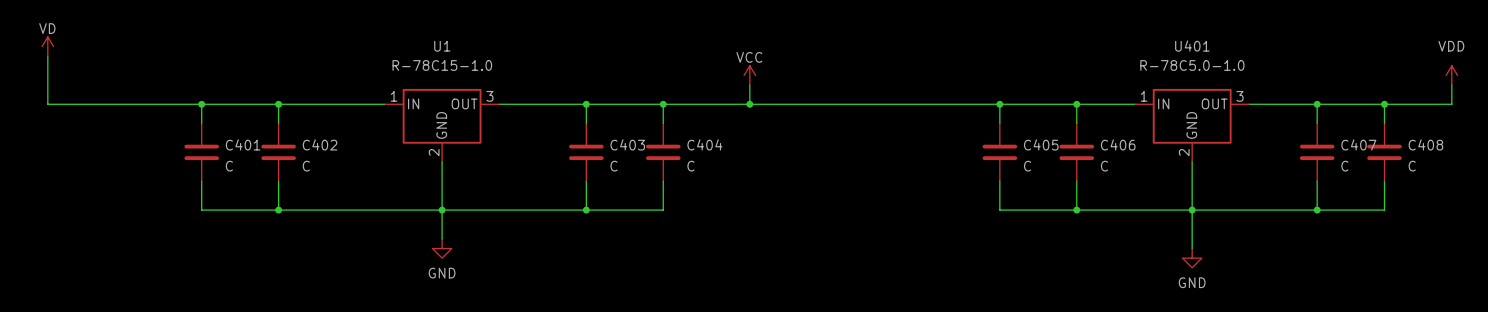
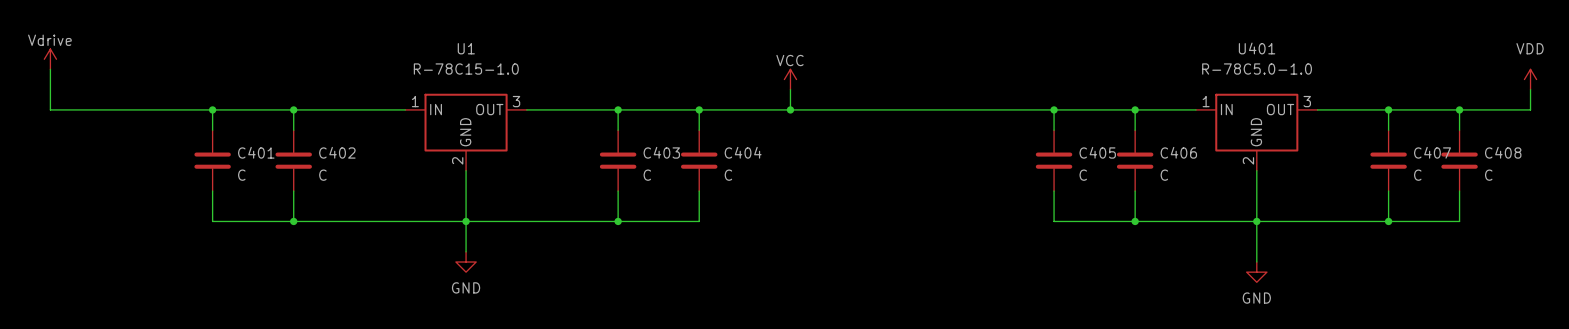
power symbol: VD (47, 46) -> none
power symbol: none -> Vdrive (50, 59)

